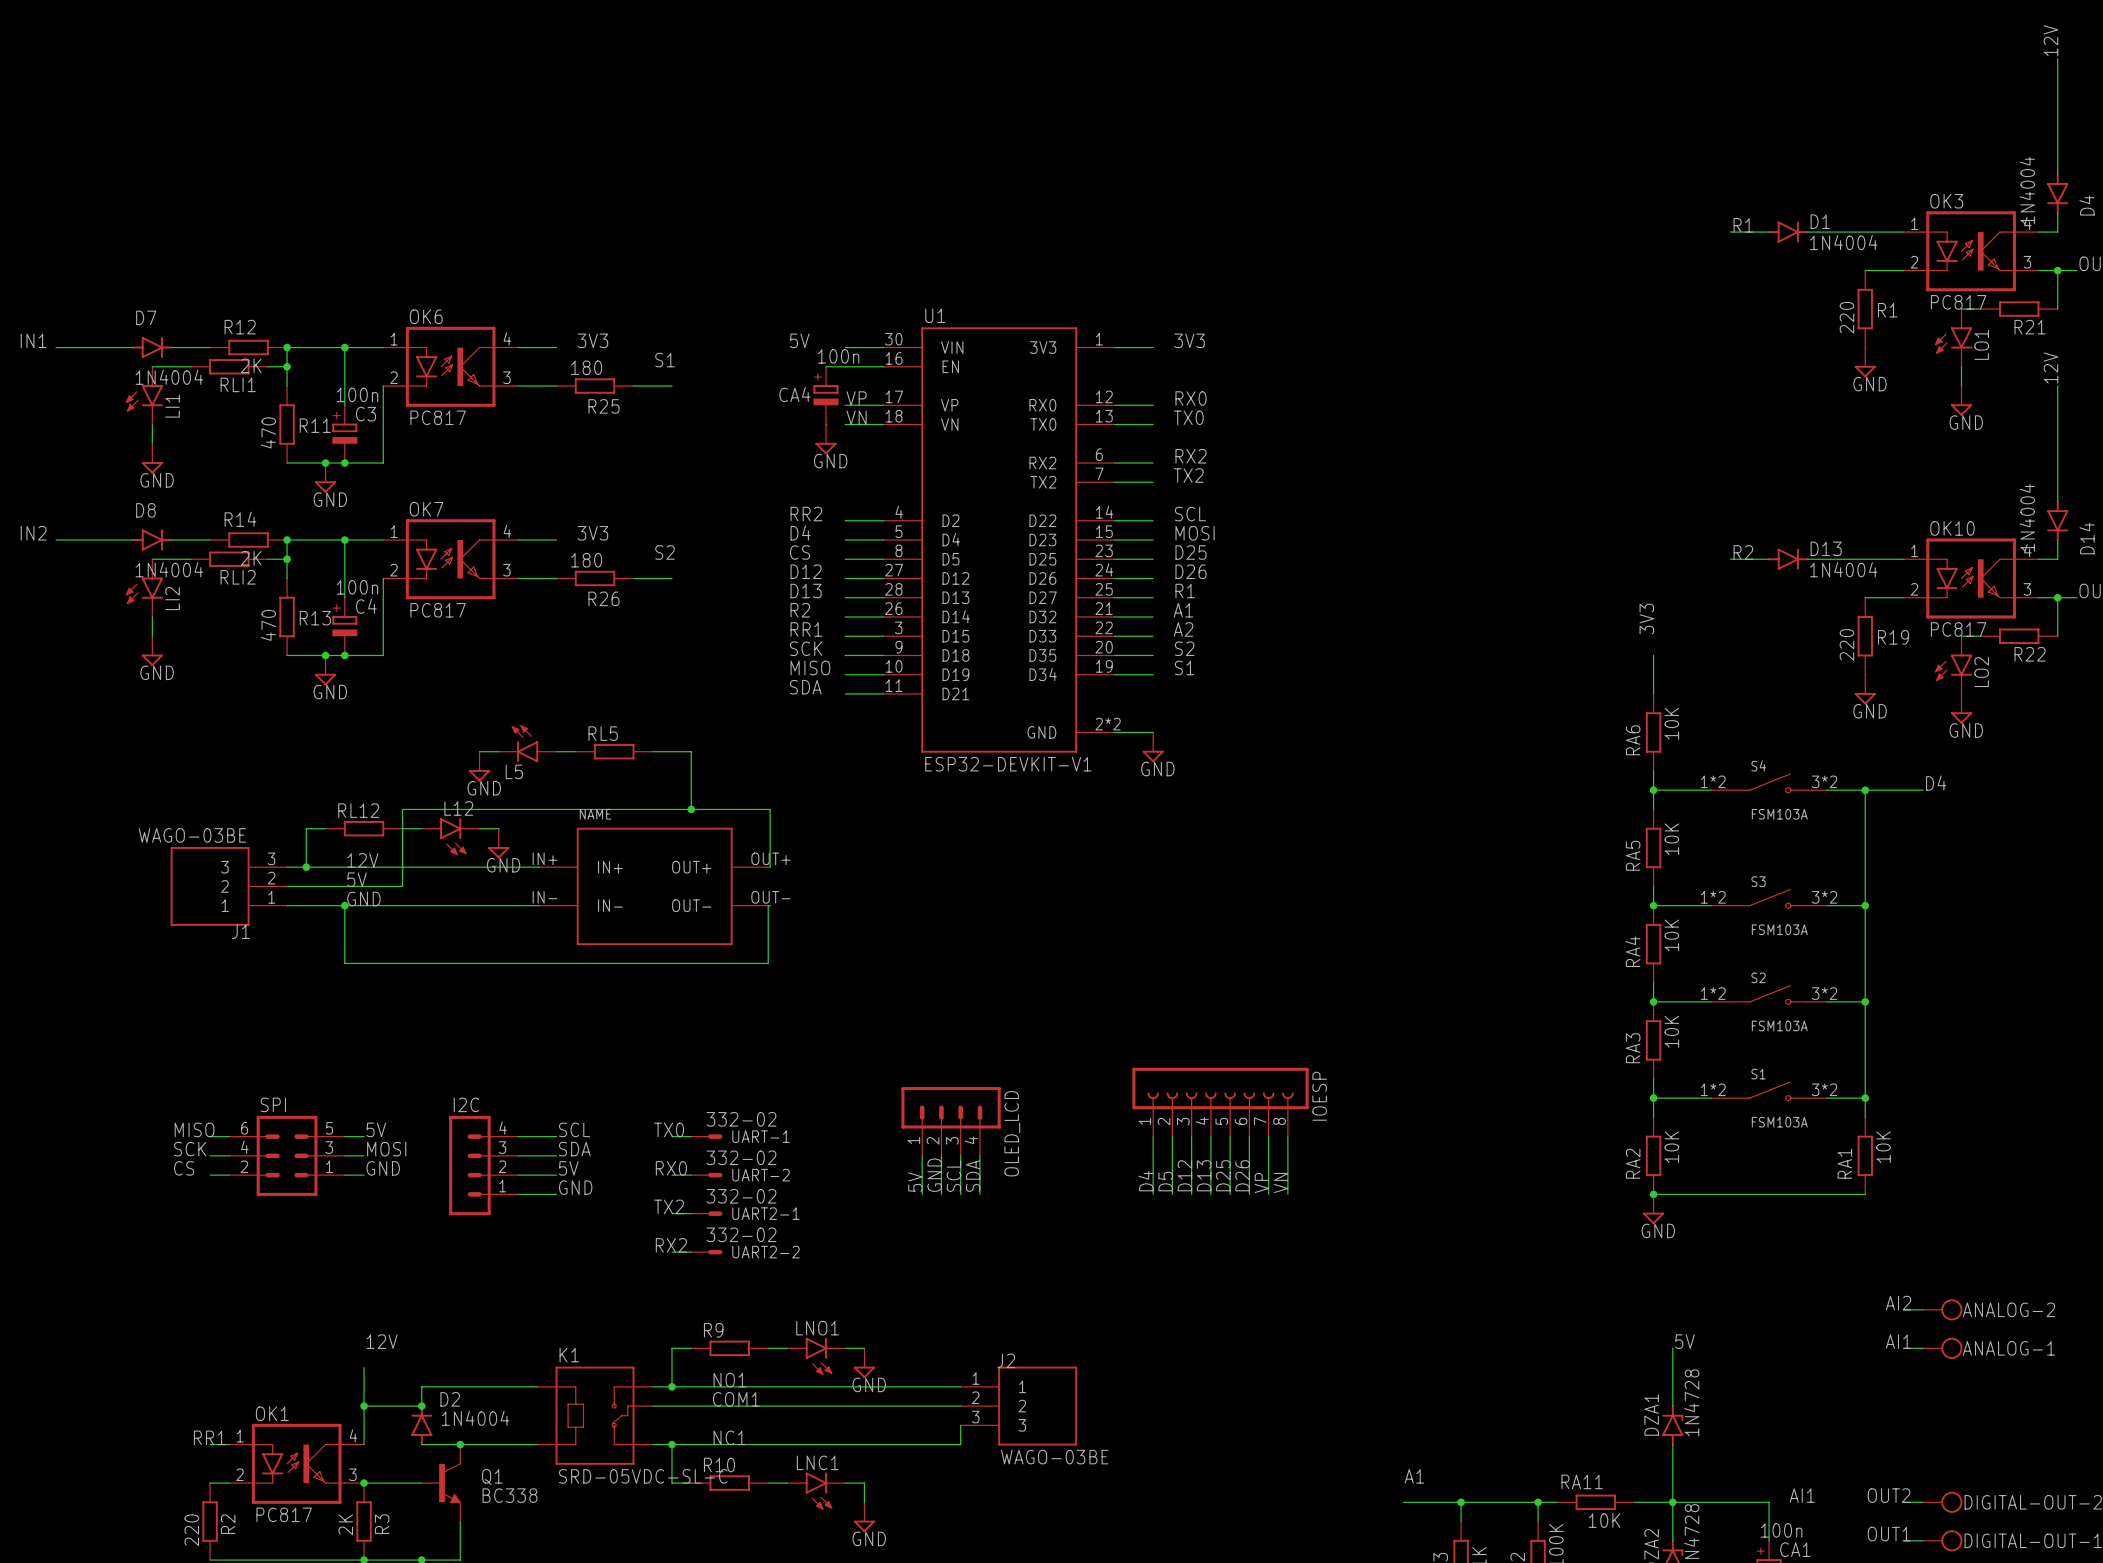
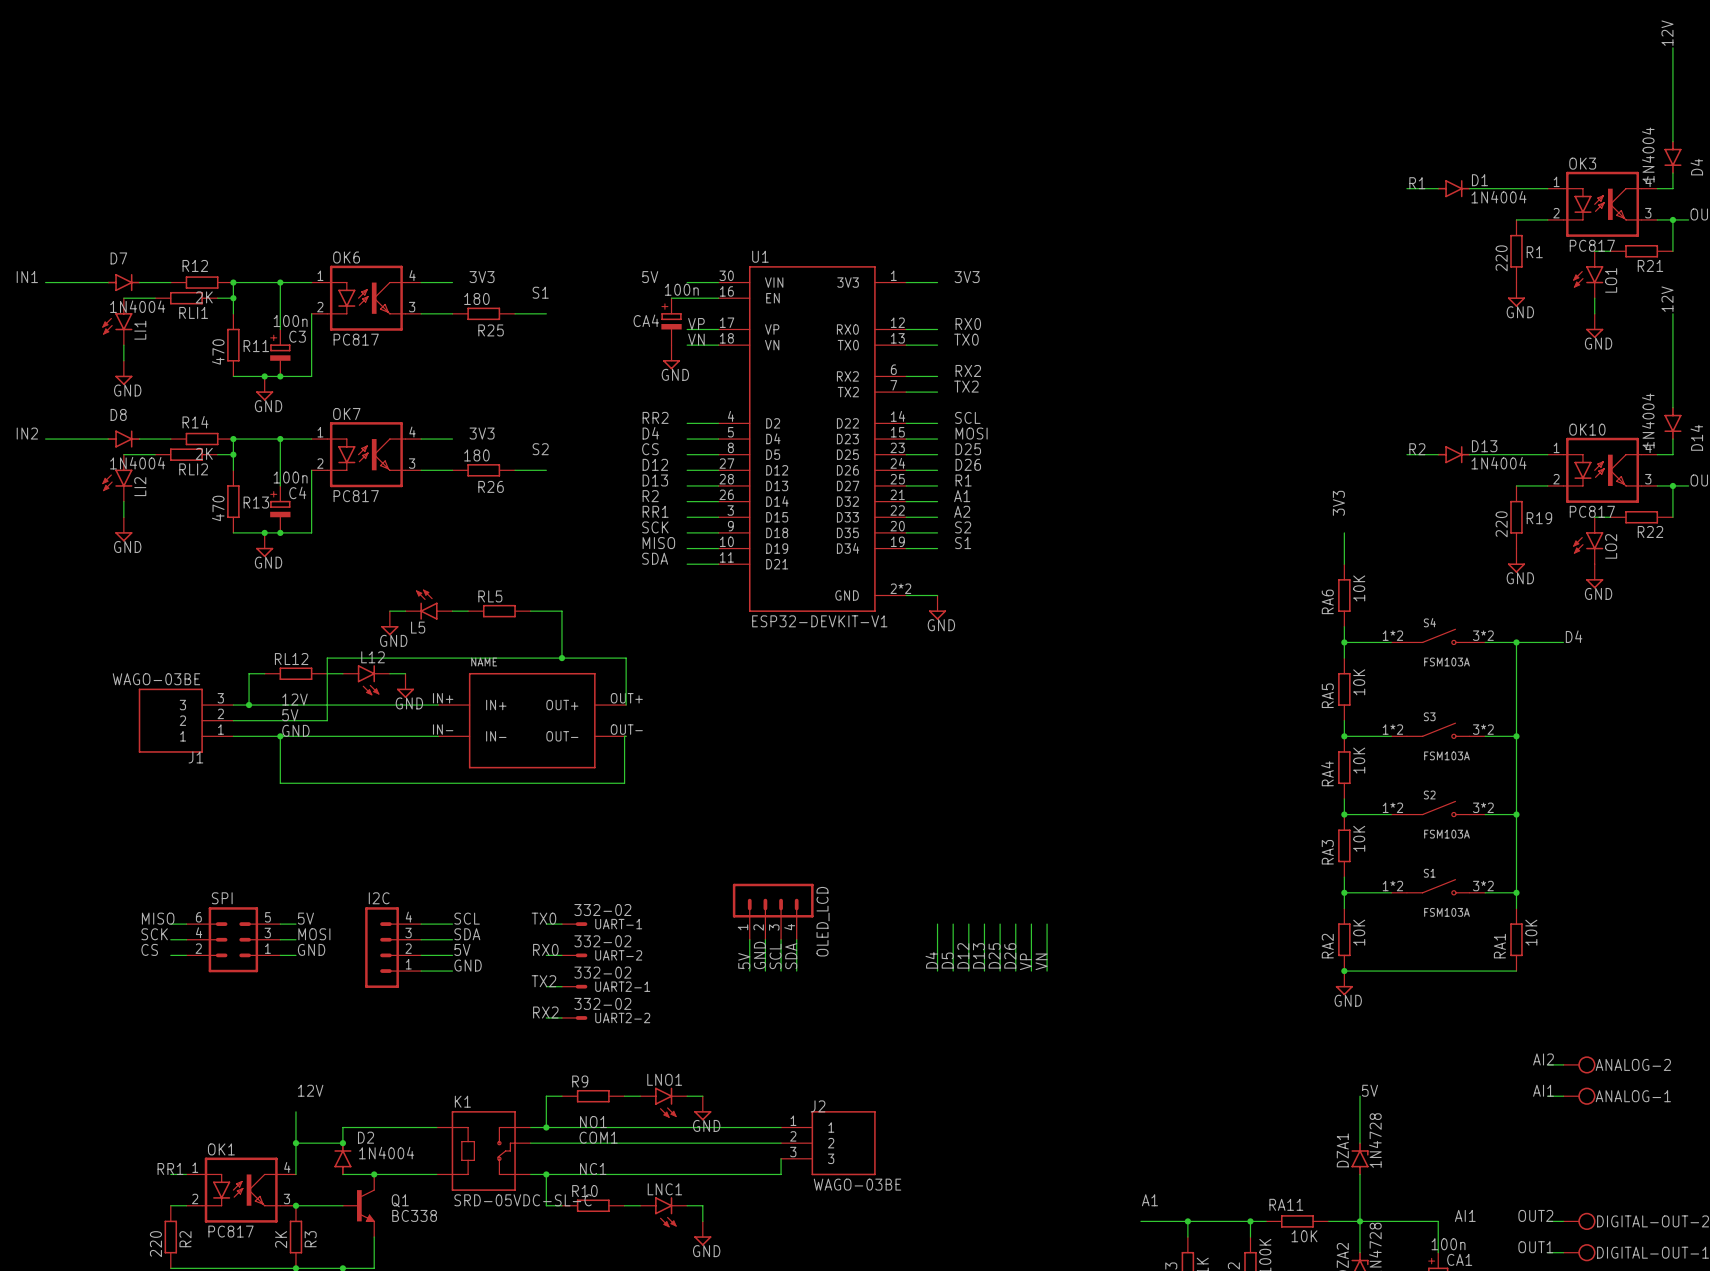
IOESP: (1220, 1102) -> none

